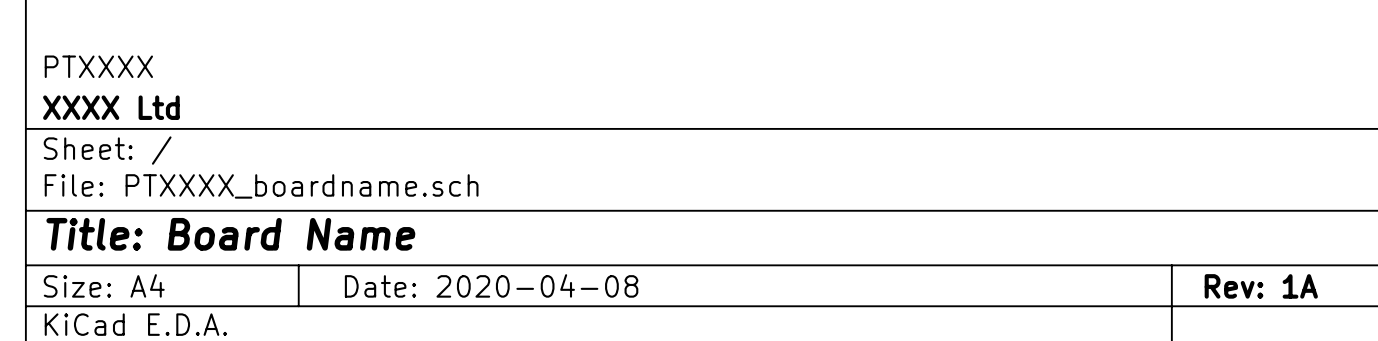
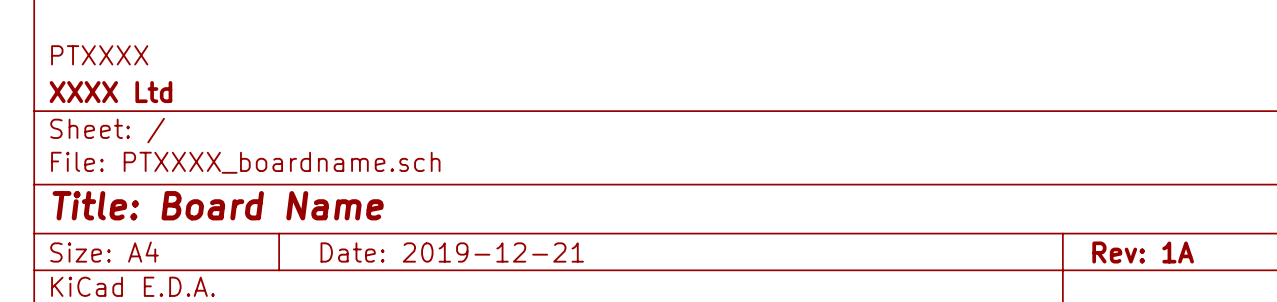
title block: Date: 2020-04-08 (491, 285) -> Date: 2019-12-21 (452, 252)

